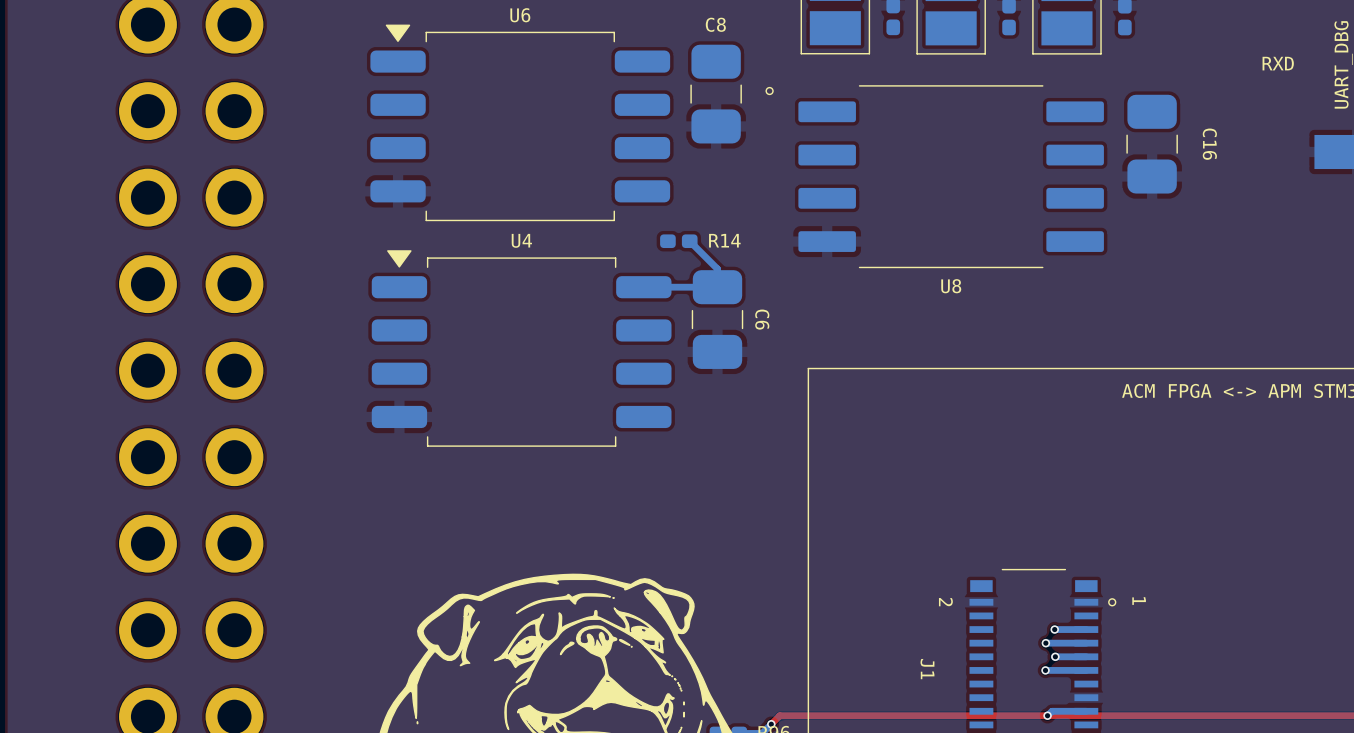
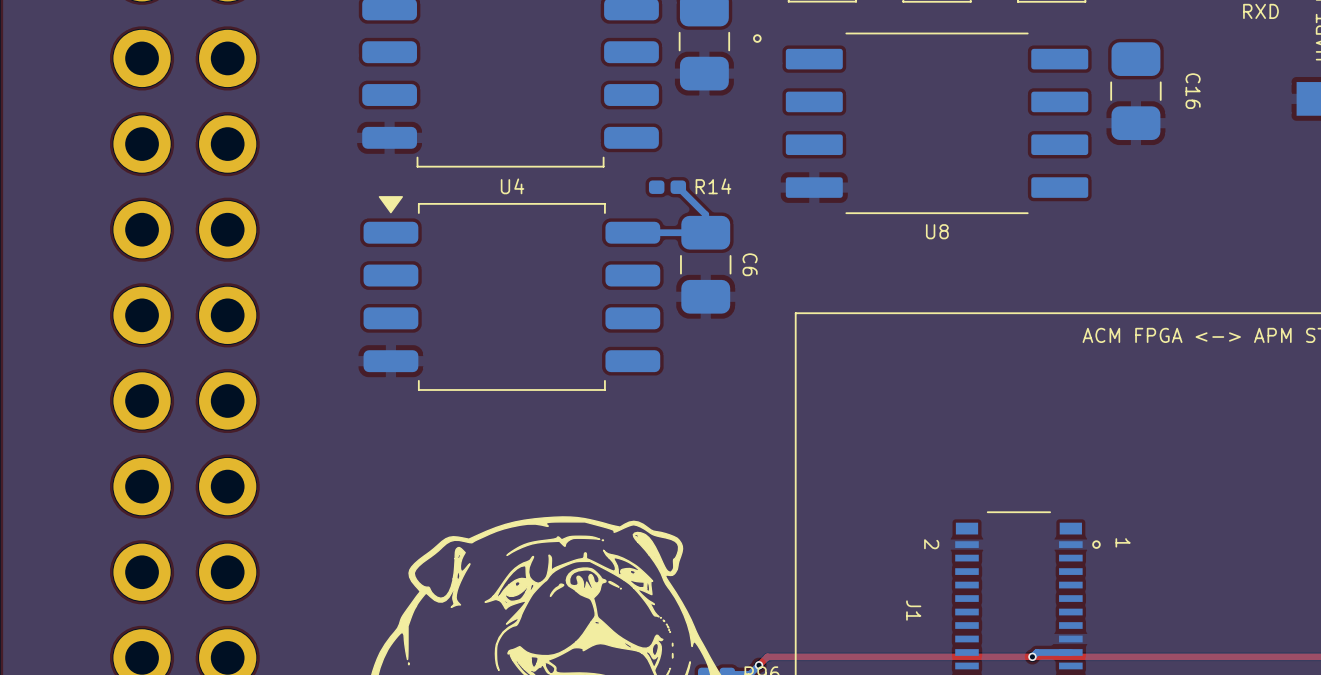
via: (1054, 629) -> none
bottom track: (1086, 629) (1054, 629) -> none
via: (1045, 643) -> none
bottom track: (1086, 643) (1045, 643) -> none
via: (1055, 656) -> none
bottom track: (1086, 656) (1054, 656) -> none
via: (1045, 670) -> none
bottom track: (1086, 670) (1045, 670) -> none

